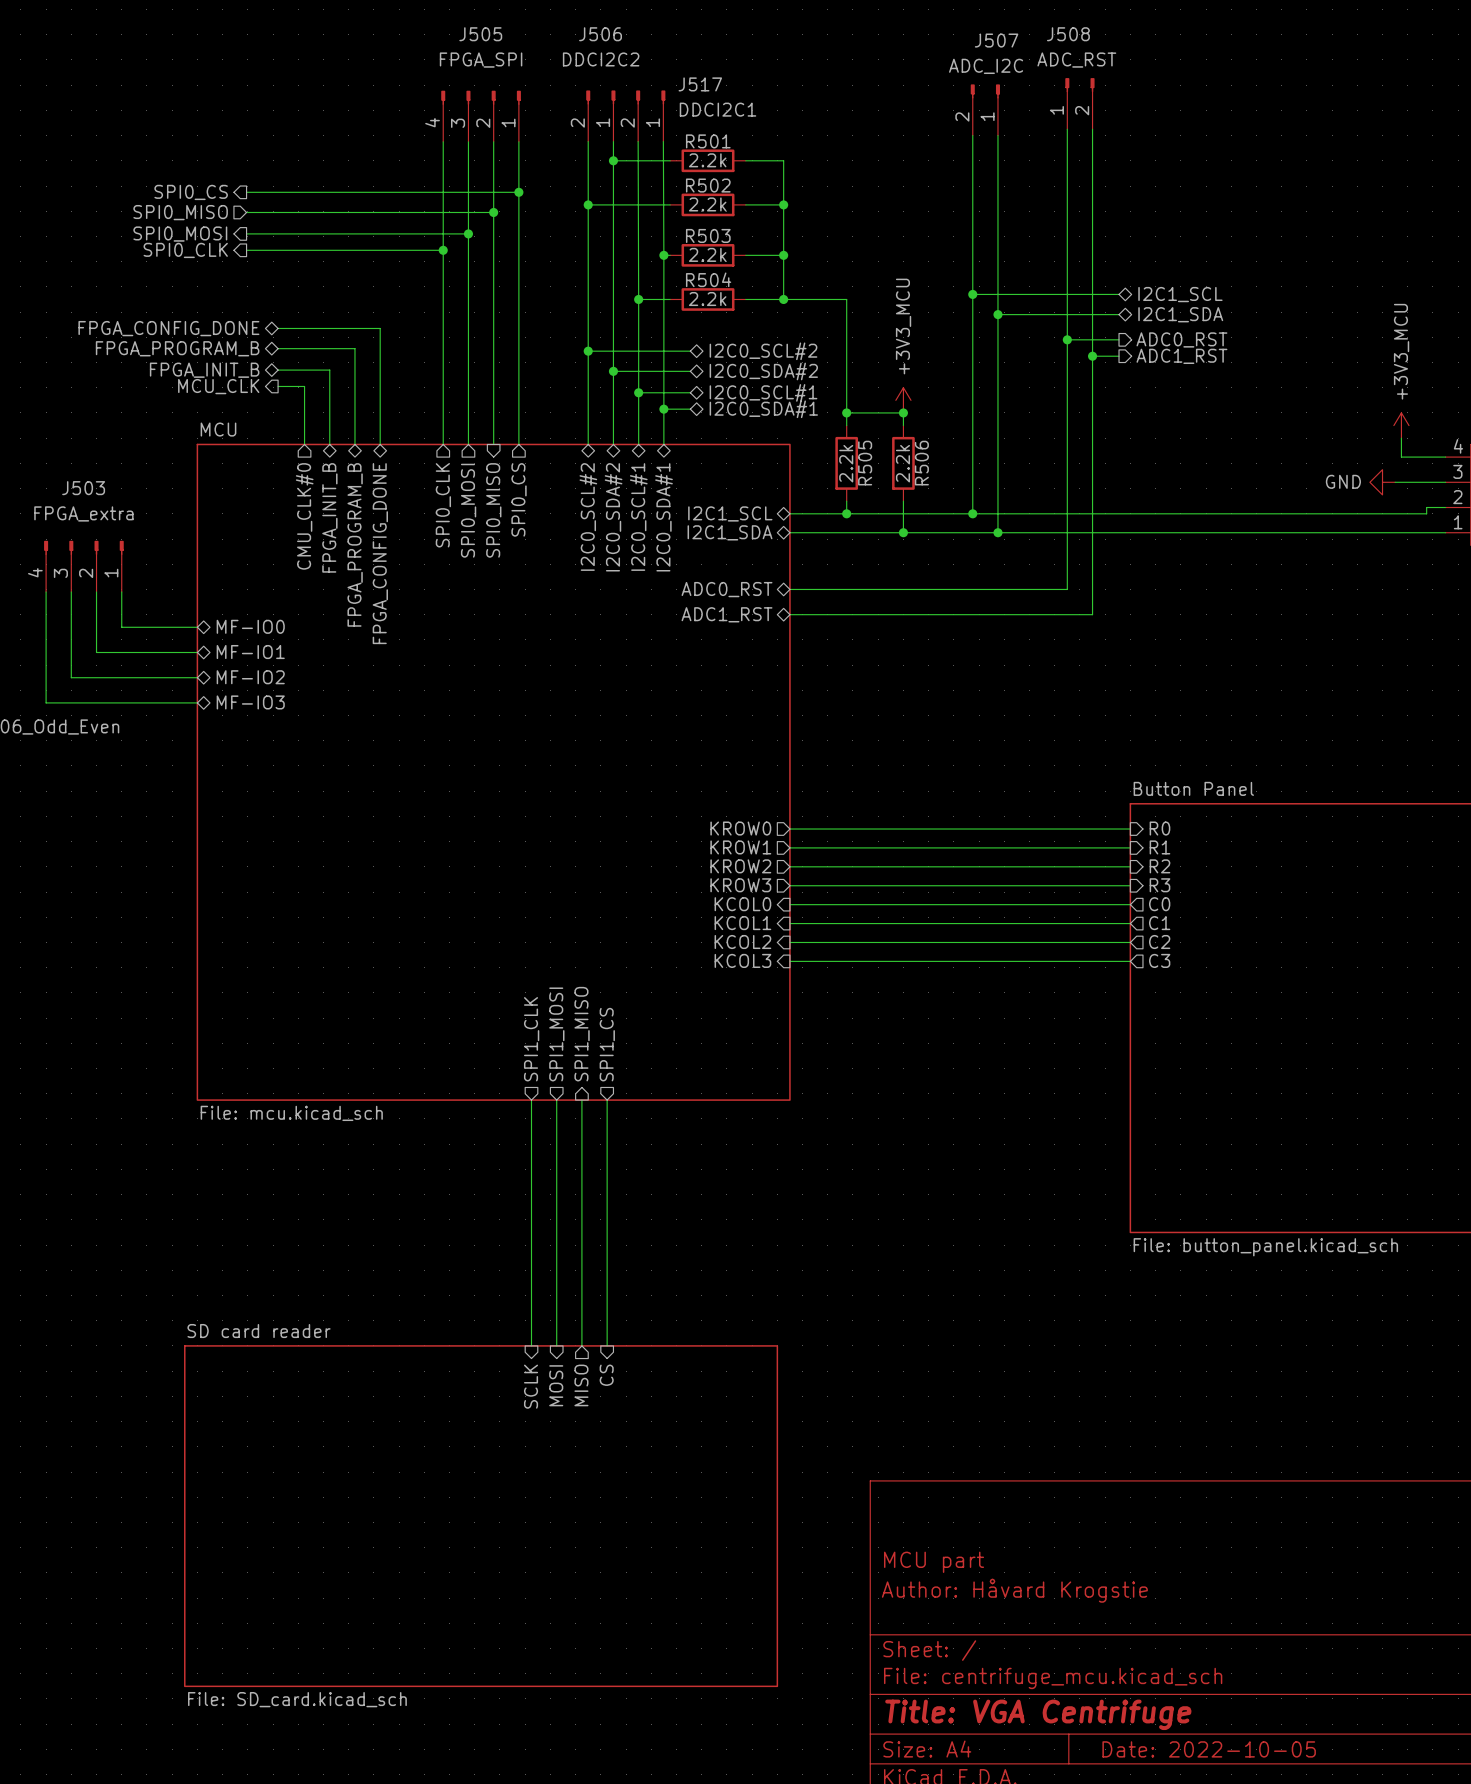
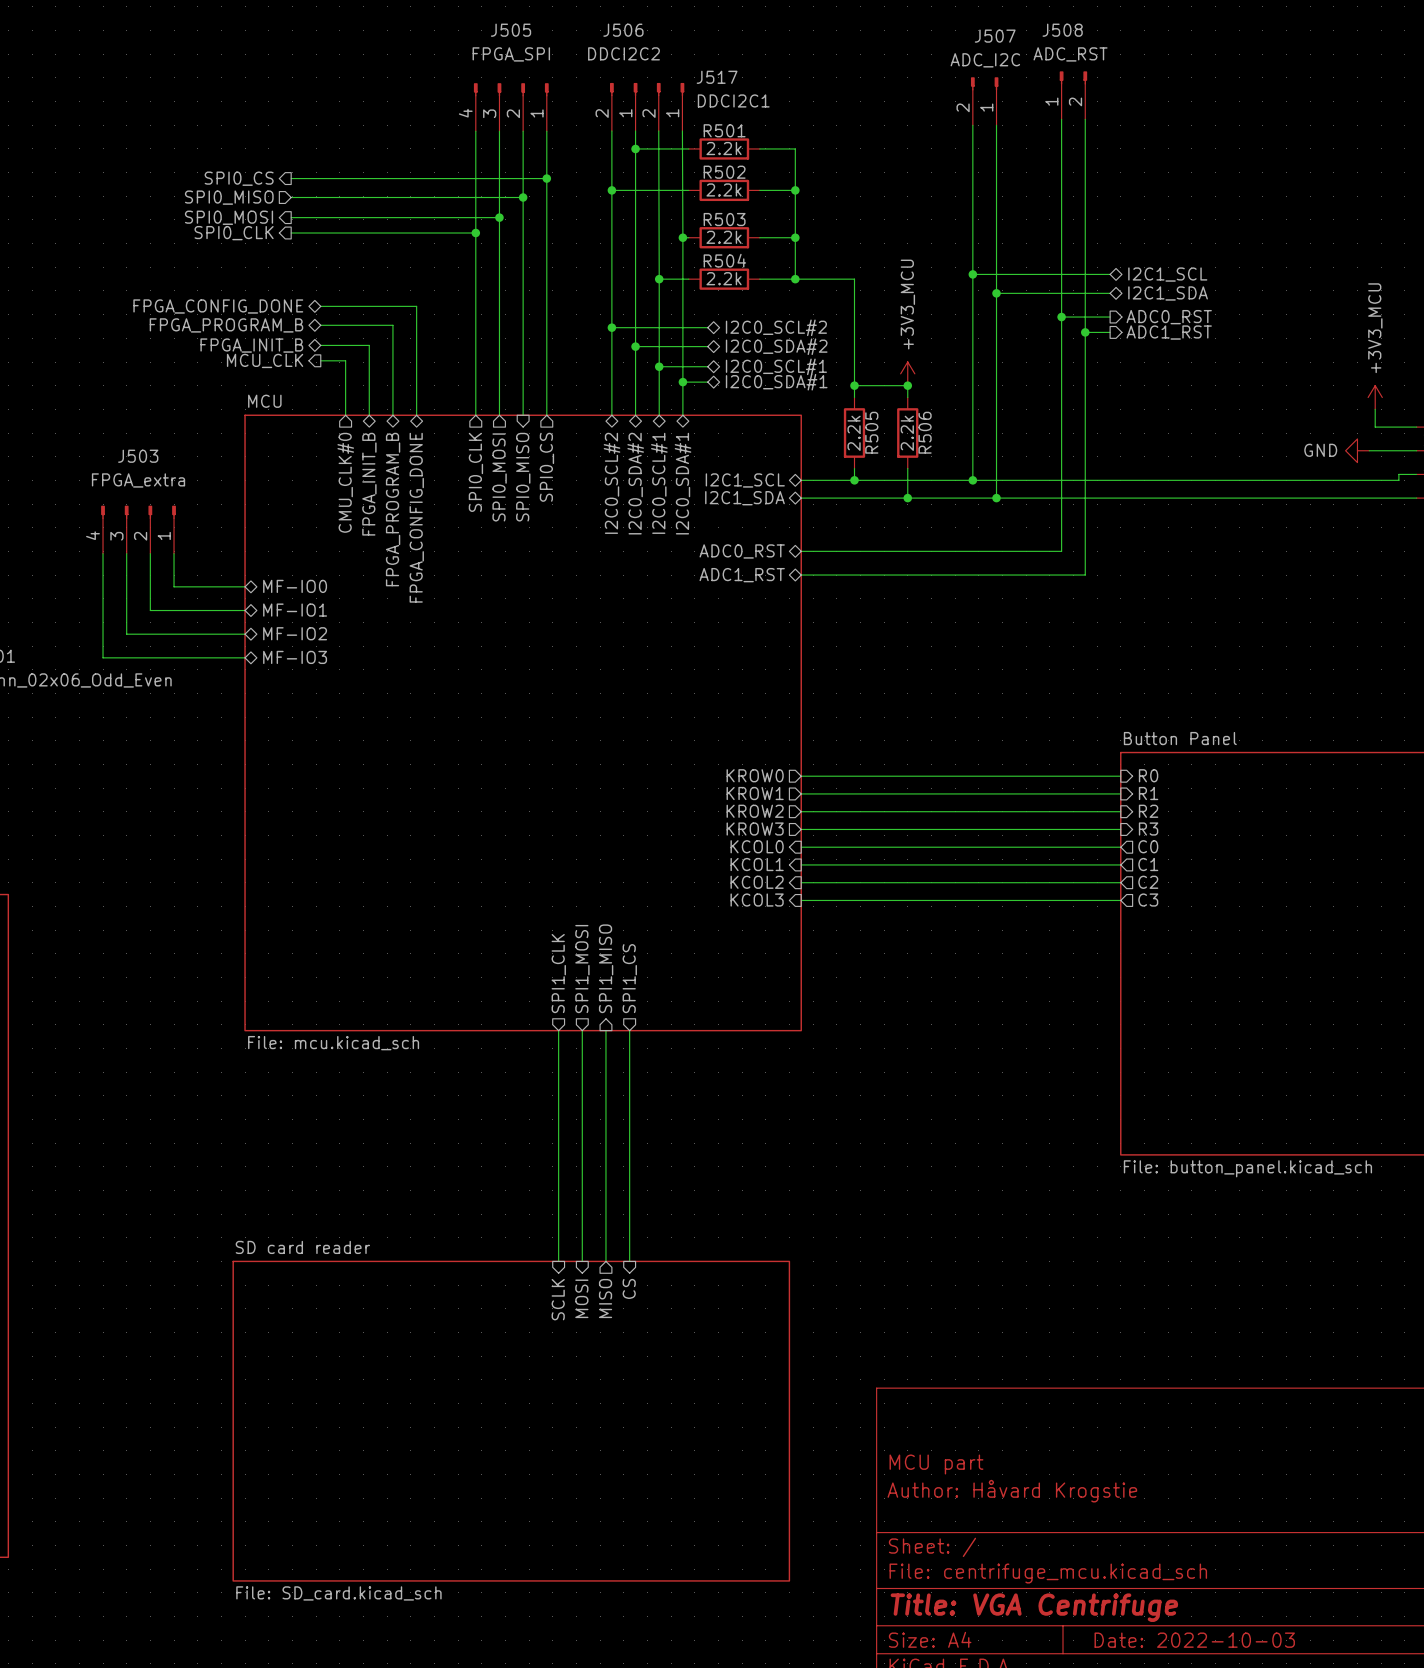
title block: Date: 2022-10-05 (1209, 1749) -> Date: 2022-10-03 (1194, 1640)

